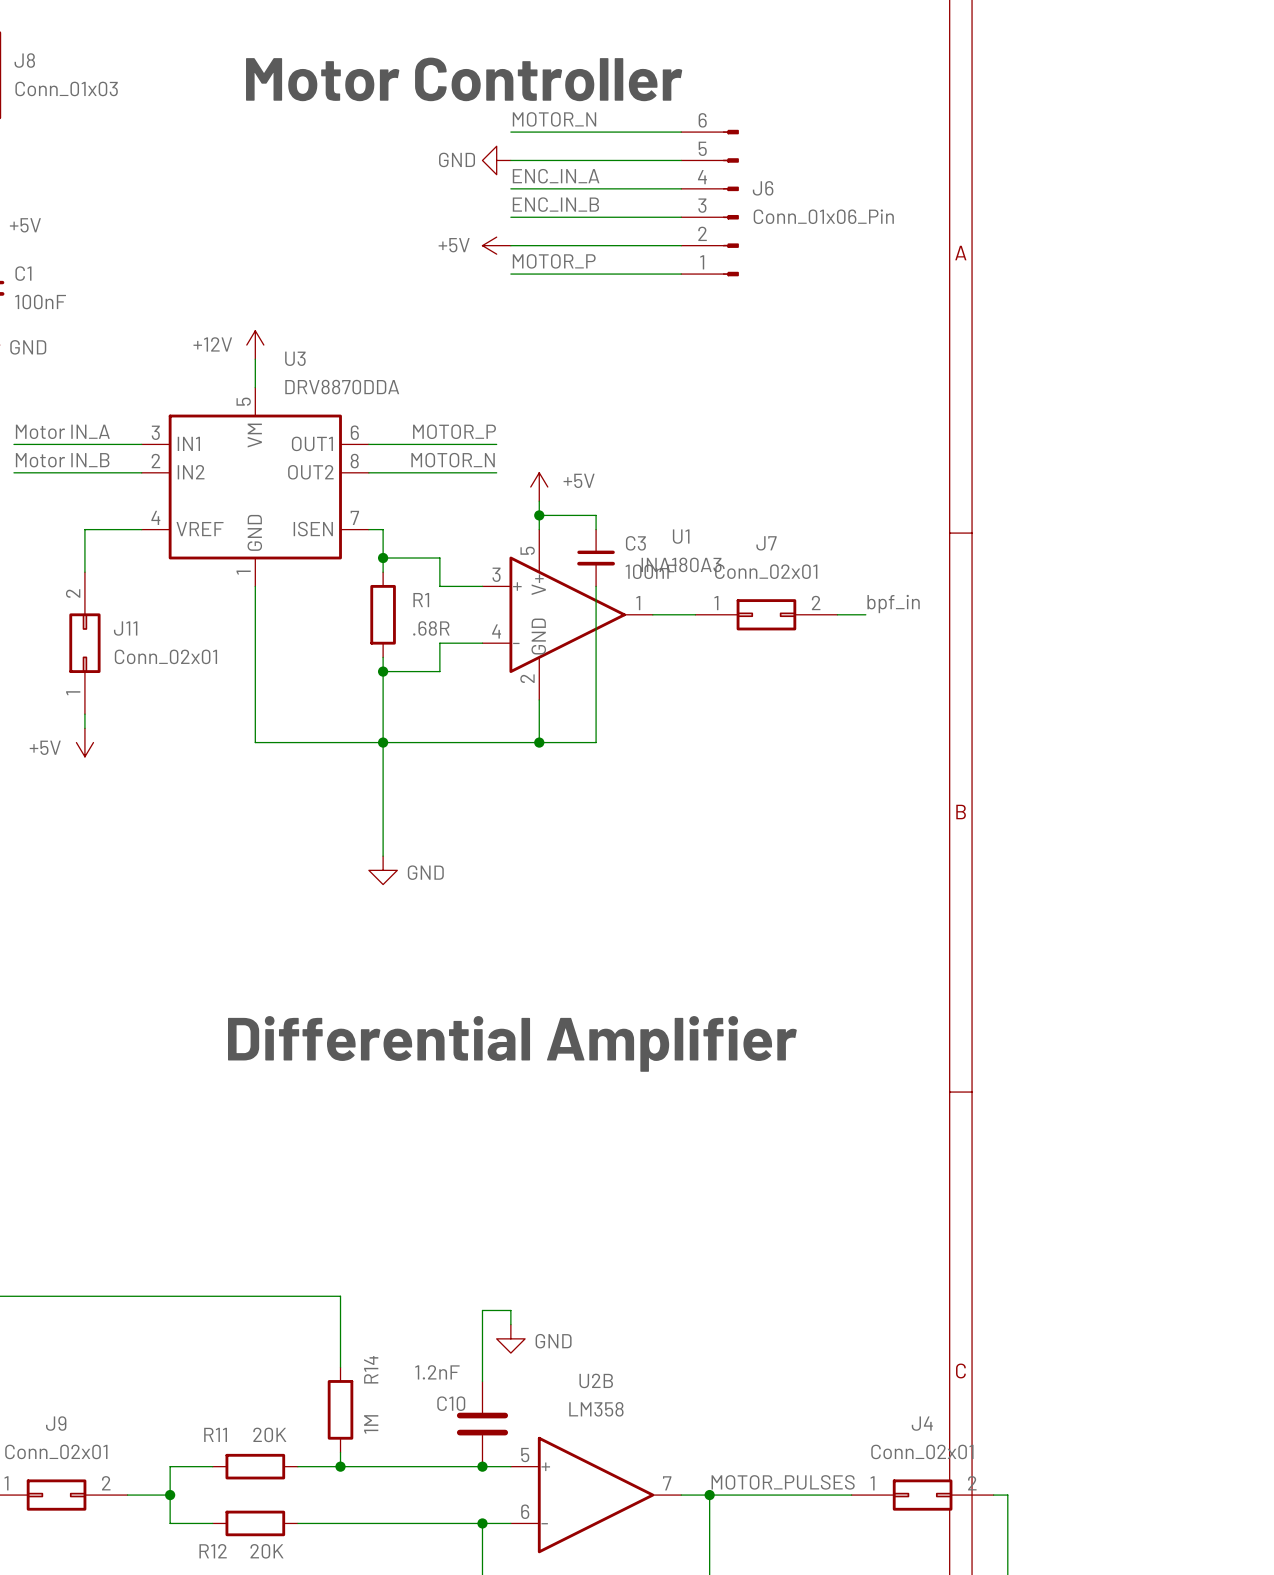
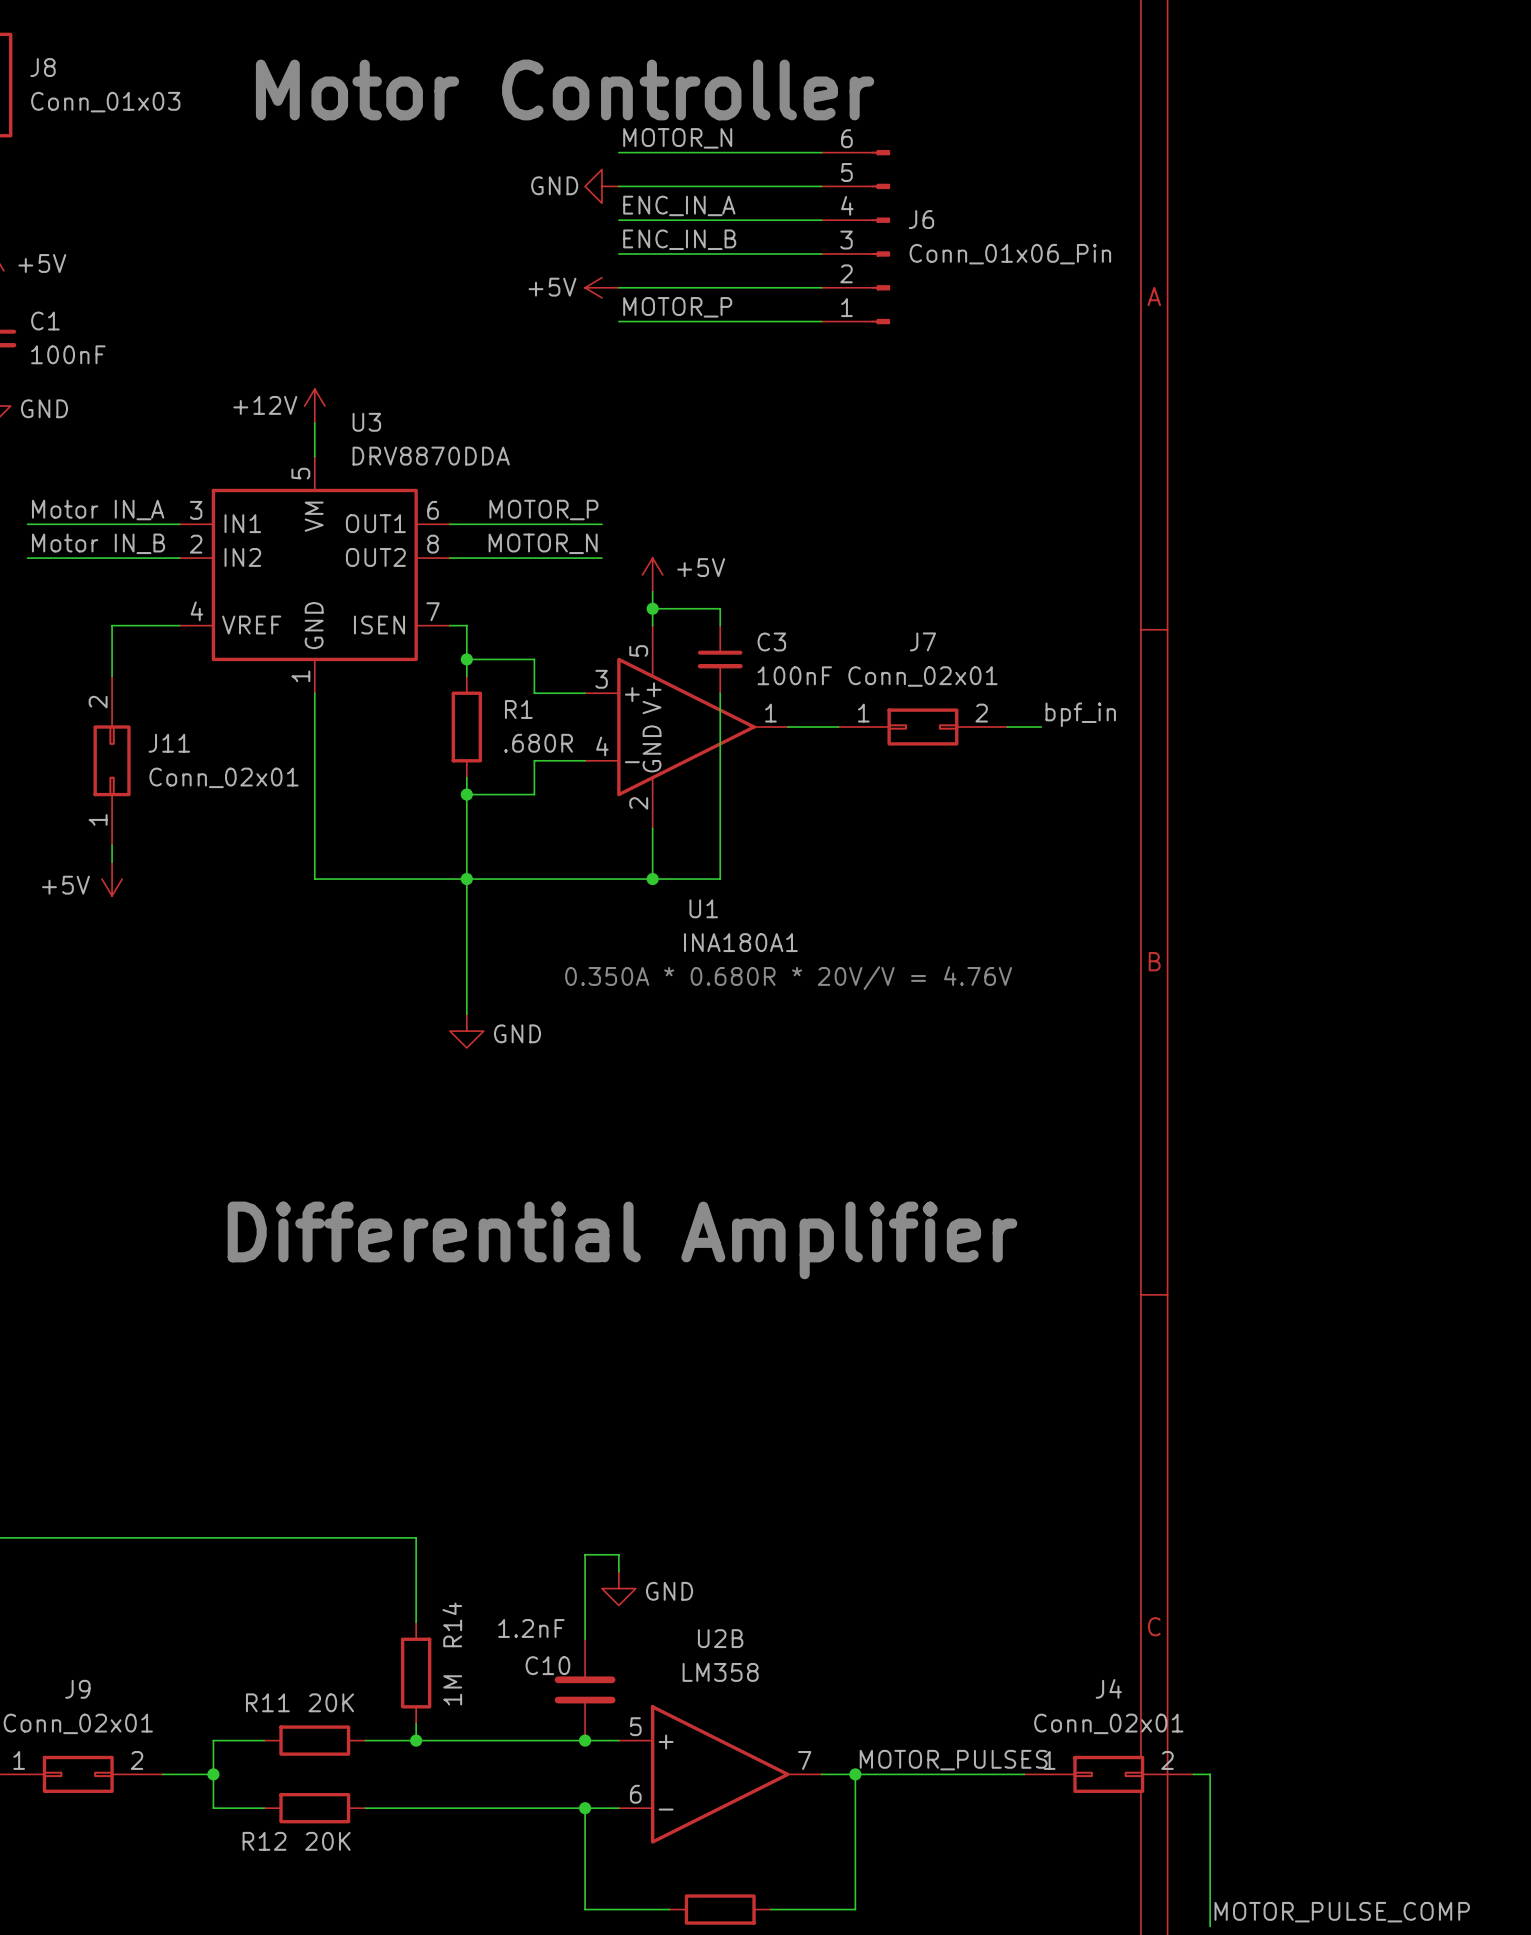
U1 name position: U1 (681, 536) -> U1 (703, 908)
U1 value: INA180A3 (681, 564) -> INA180A1 (740, 942)
R1 value: .68R (431, 628) -> .680R (538, 743)
text: none -> 0.350A * 0.680R * 20V/V = 4.76V (788, 978)

